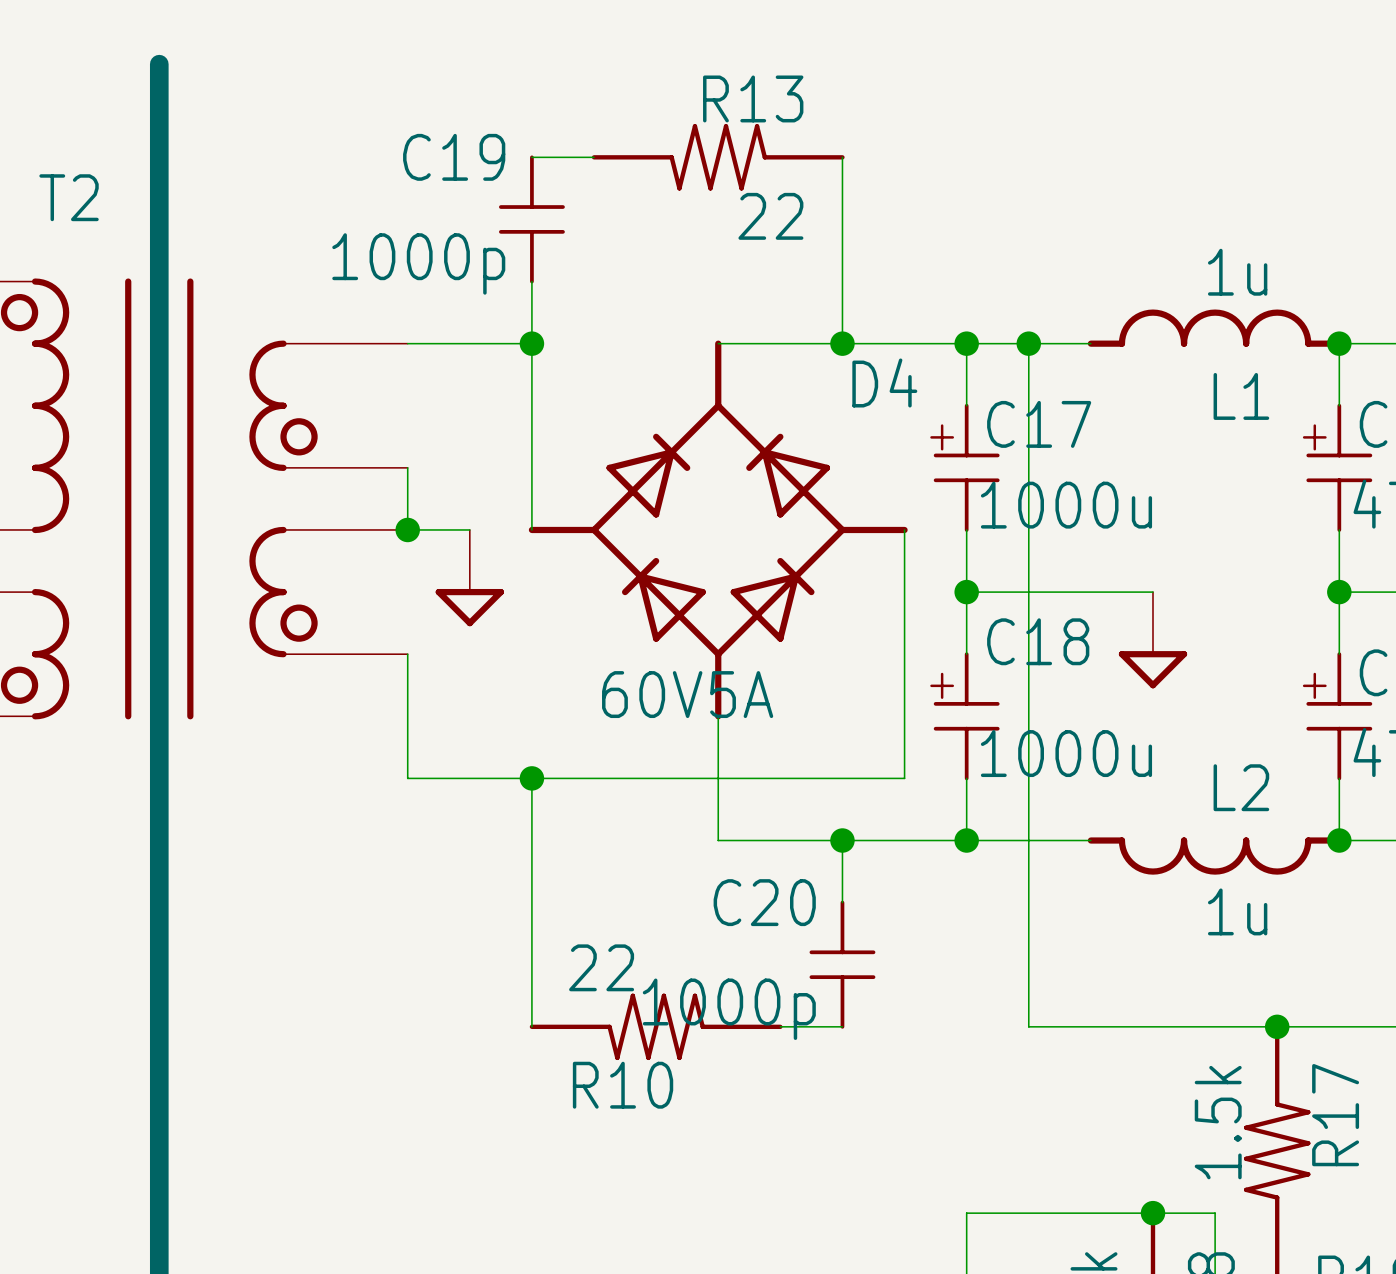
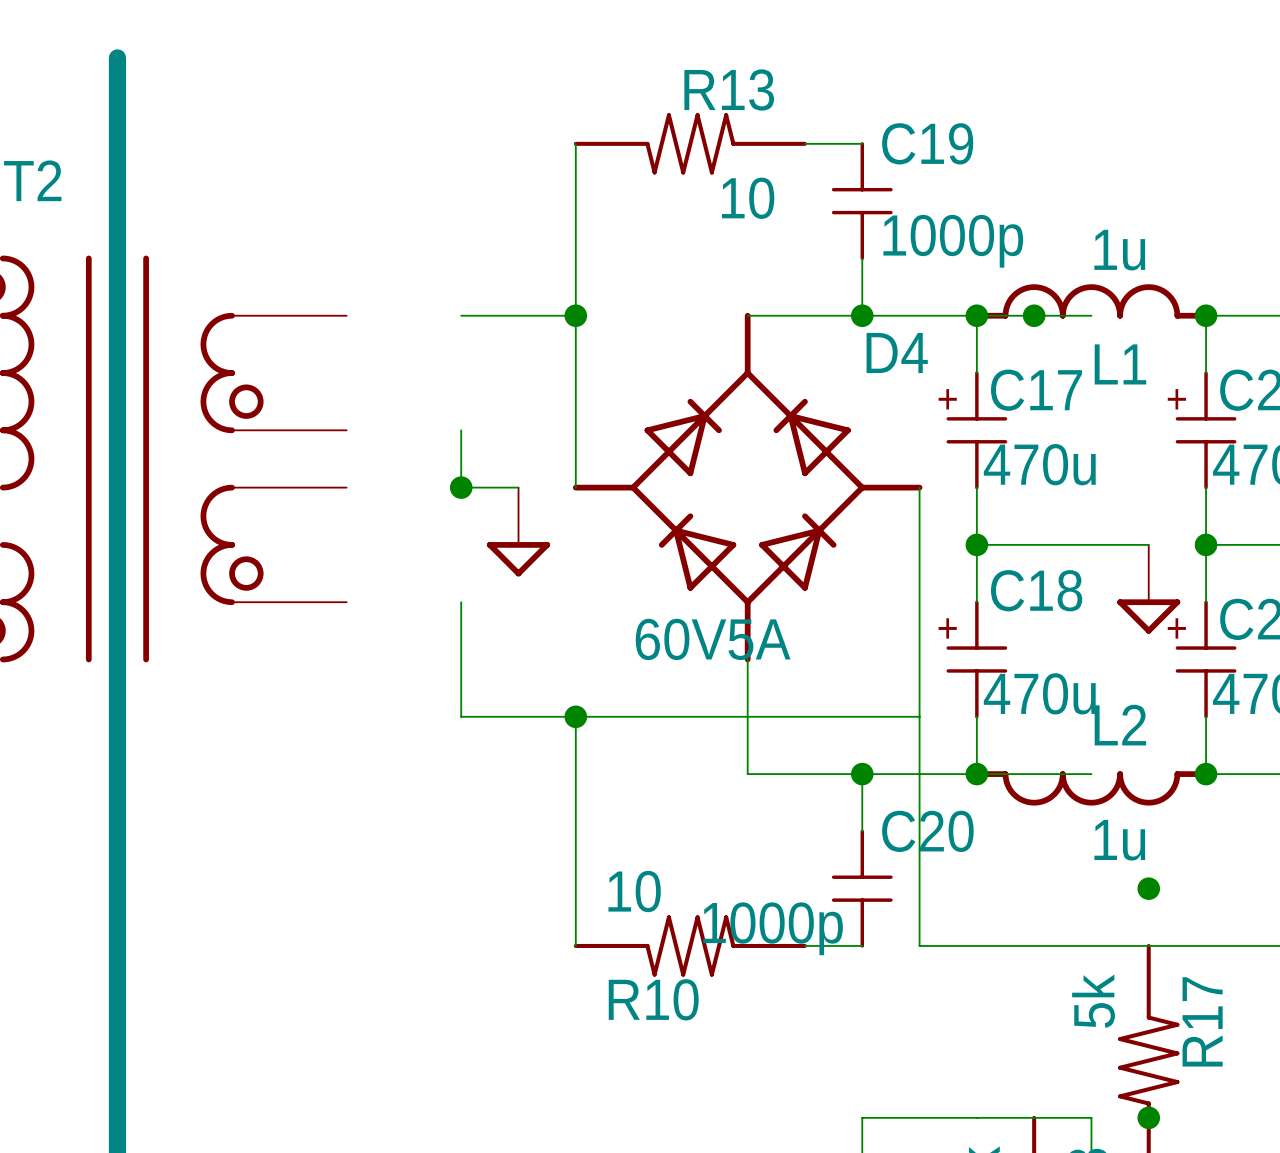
C19 name position: C19 (454, 157) -> C19 (927, 143)
wire: (531, 157) (594, 157) -> (804, 143) (862, 143)
wire: none -> (575, 143) (575, 487)
R13 position: (718, 157) -> (690, 143)
wire: (842, 157) (842, 343) (718, 343) -> none
R13 value: 22 (770, 216) -> 10 (748, 198)
C19 position: (531, 219) -> (862, 201)
C19 value position: 1000p (418, 263) -> 1000p (953, 241)
wire: (531, 281) (531, 467) -> none
D4 symbol: [528, 340, 908, 720] -> [572, 312, 923, 663]
wire: (407, 343) (531, 343) -> (575, 315) (461, 315)
junction: (531, 343) -> none
junction: none -> (575, 315)
junction: (842, 343) -> none
wire: (966, 343) (966, 405) -> (862, 315) (862, 258)
wire: (1028, 343) (1028, 529) -> none
junction: (1028, 343) -> none
junction: none -> (976, 315)
junction: none -> (1034, 315)
wire: none -> (1091, 315) (976, 315) (976, 373)
wire: (407, 467) (407, 529) (469, 529) -> none
C17 position: (966, 467) -> (976, 430)
C17 value: 1000u (1066, 505) -> 470u (1039, 464)
junction: (407, 529) -> none
junction: none -> (461, 487)
wire: (904, 529) (904, 778) -> (919, 716) (804, 716)
wire: (966, 529) (966, 654) -> (976, 487) (976, 602)
power symbol position: (469, 578) -> (518, 532)
wire: (966, 592) (1090, 592) -> (1034, 544) (1148, 544)
junction position: (966, 592) -> (976, 544)
power symbol position: (1152, 640) -> (1148, 589)
wire: (407, 654) (407, 778) (531, 778) (531, 1026) -> none
wire: none -> (461, 602) (461, 716)
wire: (718, 716) (718, 840) (842, 840) (842, 902) -> none
wire: none -> (747, 659) (747, 774)
C18 position: (966, 716) -> (976, 659)
C18 value: 1000u (1066, 753) -> 470u (1039, 693)
junction: (531, 778) -> none
wire: none -> (575, 716) (575, 945)
junction: none -> (575, 716)
wire: (966, 778) (966, 840) -> (862, 831) (862, 774)
wire: none -> (976, 716) (976, 774) (1091, 774)
junction: (842, 840) -> none
junction: none -> (976, 774)
C20 name position: C20 (764, 902) -> C20 (927, 831)
C20 position: (842, 964) -> (862, 888)
R10 value: 22 (601, 967) -> 10 (634, 891)
R10 position: (656, 1026) -> (690, 945)
wire: (780, 1026) (842, 1026) -> (804, 945) (862, 945)
junction position: (1277, 1026) -> (1148, 888)
R17 value: 1.5k (1218, 1122) -> 5k (1093, 1001)
junction: (1152, 1213) -> none
junction: none -> (1148, 1117)

